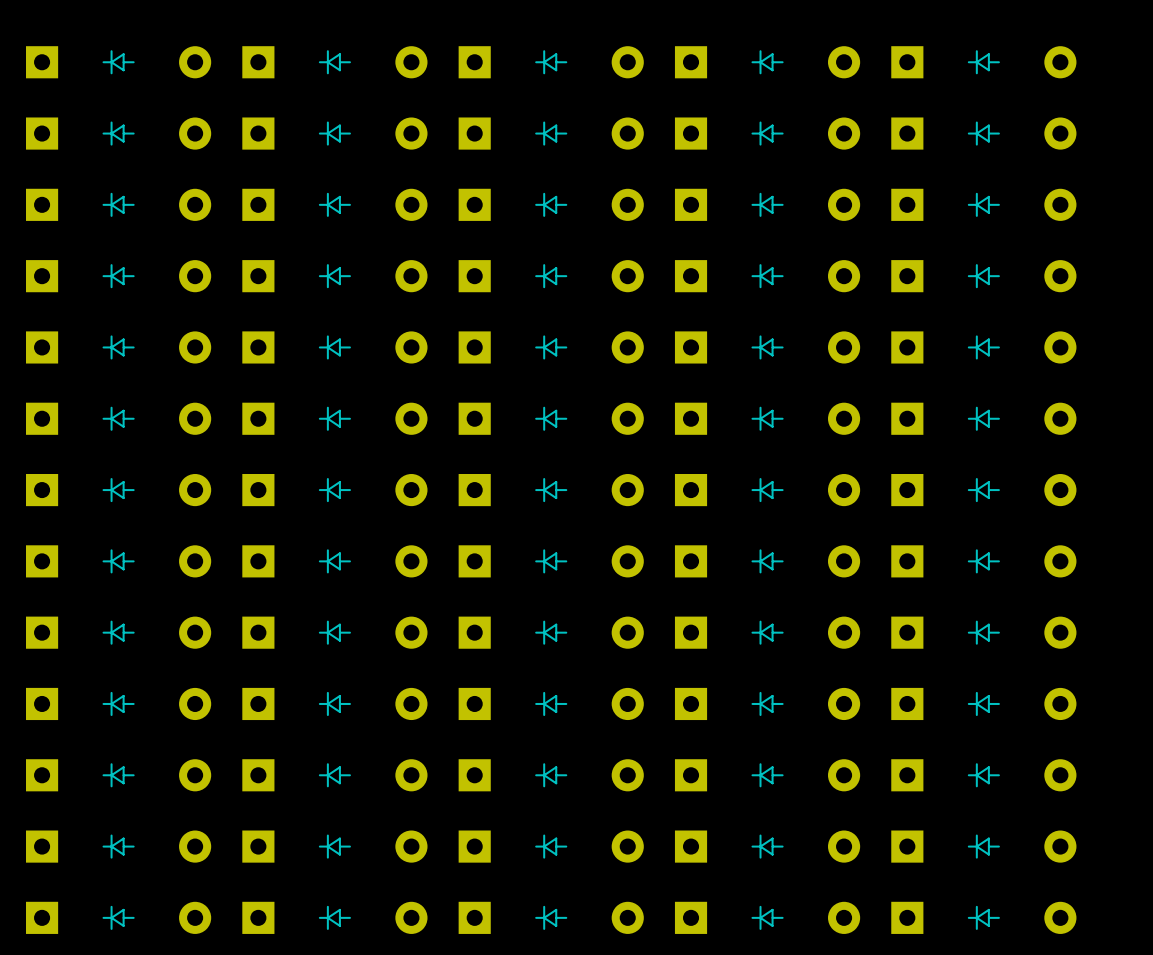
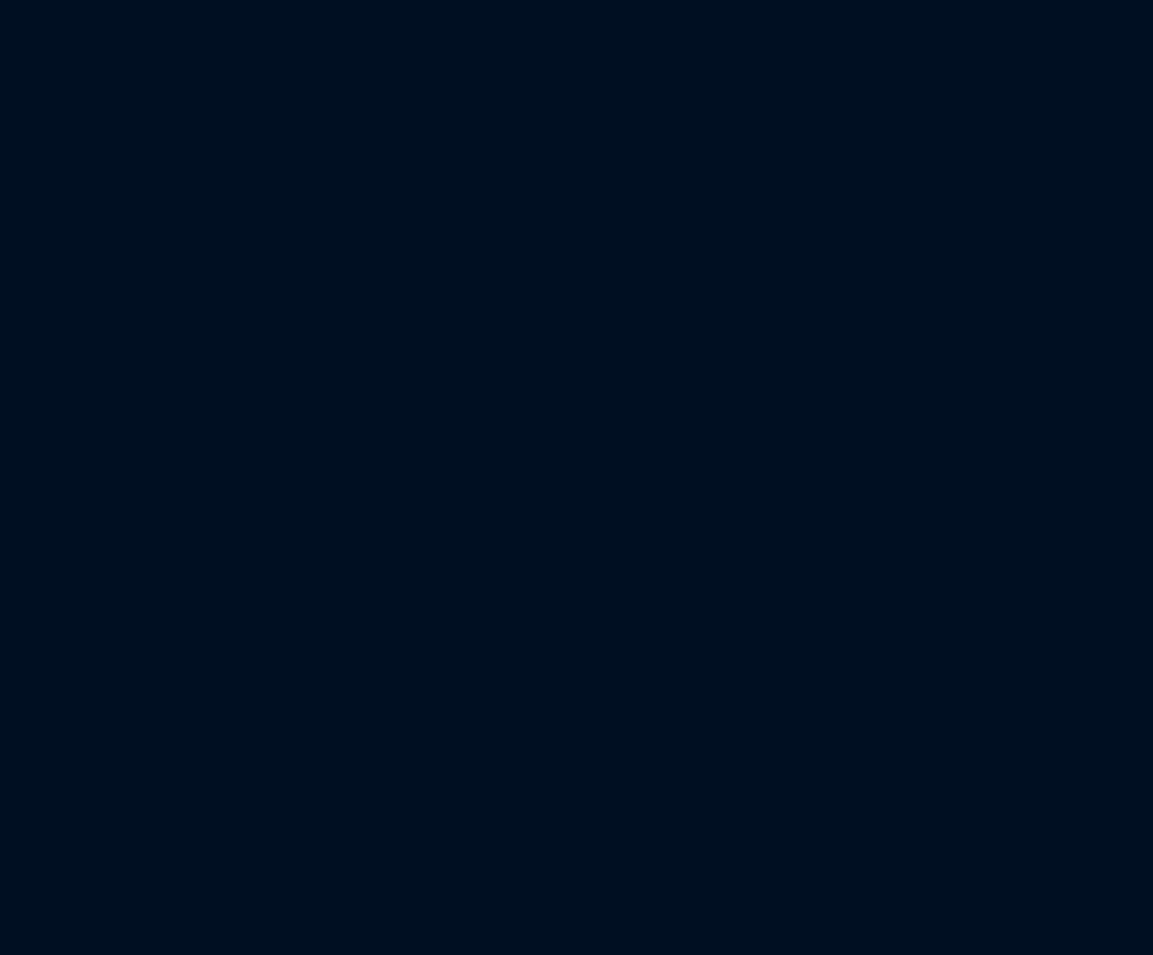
part: (118, 62) -> none
part: (334, 62) -> none
part: (551, 62) -> none
part: (767, 62) -> none
part: (983, 62) -> none
part: (118, 133) -> none
part: (334, 133) -> none
part: (551, 133) -> none
part: (767, 133) -> none
part: (983, 133) -> none
part: (118, 204) -> none
part: (334, 204) -> none
part: (551, 204) -> none
part: (767, 204) -> none
part: (983, 204) -> none
part: (118, 276) -> none
part: (334, 276) -> none
part: (551, 276) -> none
part: (767, 276) -> none
part: (983, 276) -> none
part: (118, 347) -> none
part: (334, 347) -> none
part: (551, 347) -> none
part: (767, 347) -> none
part: (983, 347) -> none
part: (118, 418) -> none
part: (334, 418) -> none
part: (551, 418) -> none
part: (767, 418) -> none
part: (983, 418) -> none
part: (118, 490) -> none
part: (334, 490) -> none
part: (551, 490) -> none
part: (767, 490) -> none
part: (983, 490) -> none
part: (118, 561) -> none
part: (334, 561) -> none
part: (551, 561) -> none
part: (767, 561) -> none
part: (983, 561) -> none
part: (118, 632) -> none
part: (334, 632) -> none
part: (551, 632) -> none
part: (767, 632) -> none
part: (983, 632) -> none
part: (118, 703) -> none
part: (334, 703) -> none
part: (551, 703) -> none
part: (767, 703) -> none
part: (983, 703) -> none
part: (118, 775) -> none
part: (334, 775) -> none
part: (551, 775) -> none
part: (767, 775) -> none
part: (983, 775) -> none
part: (118, 846) -> none
part: (334, 846) -> none
part: (551, 846) -> none
part: (767, 846) -> none
part: (983, 846) -> none
part: (118, 917) -> none
part: (334, 917) -> none
part: (551, 917) -> none
part: (767, 917) -> none
part: (983, 917) -> none

